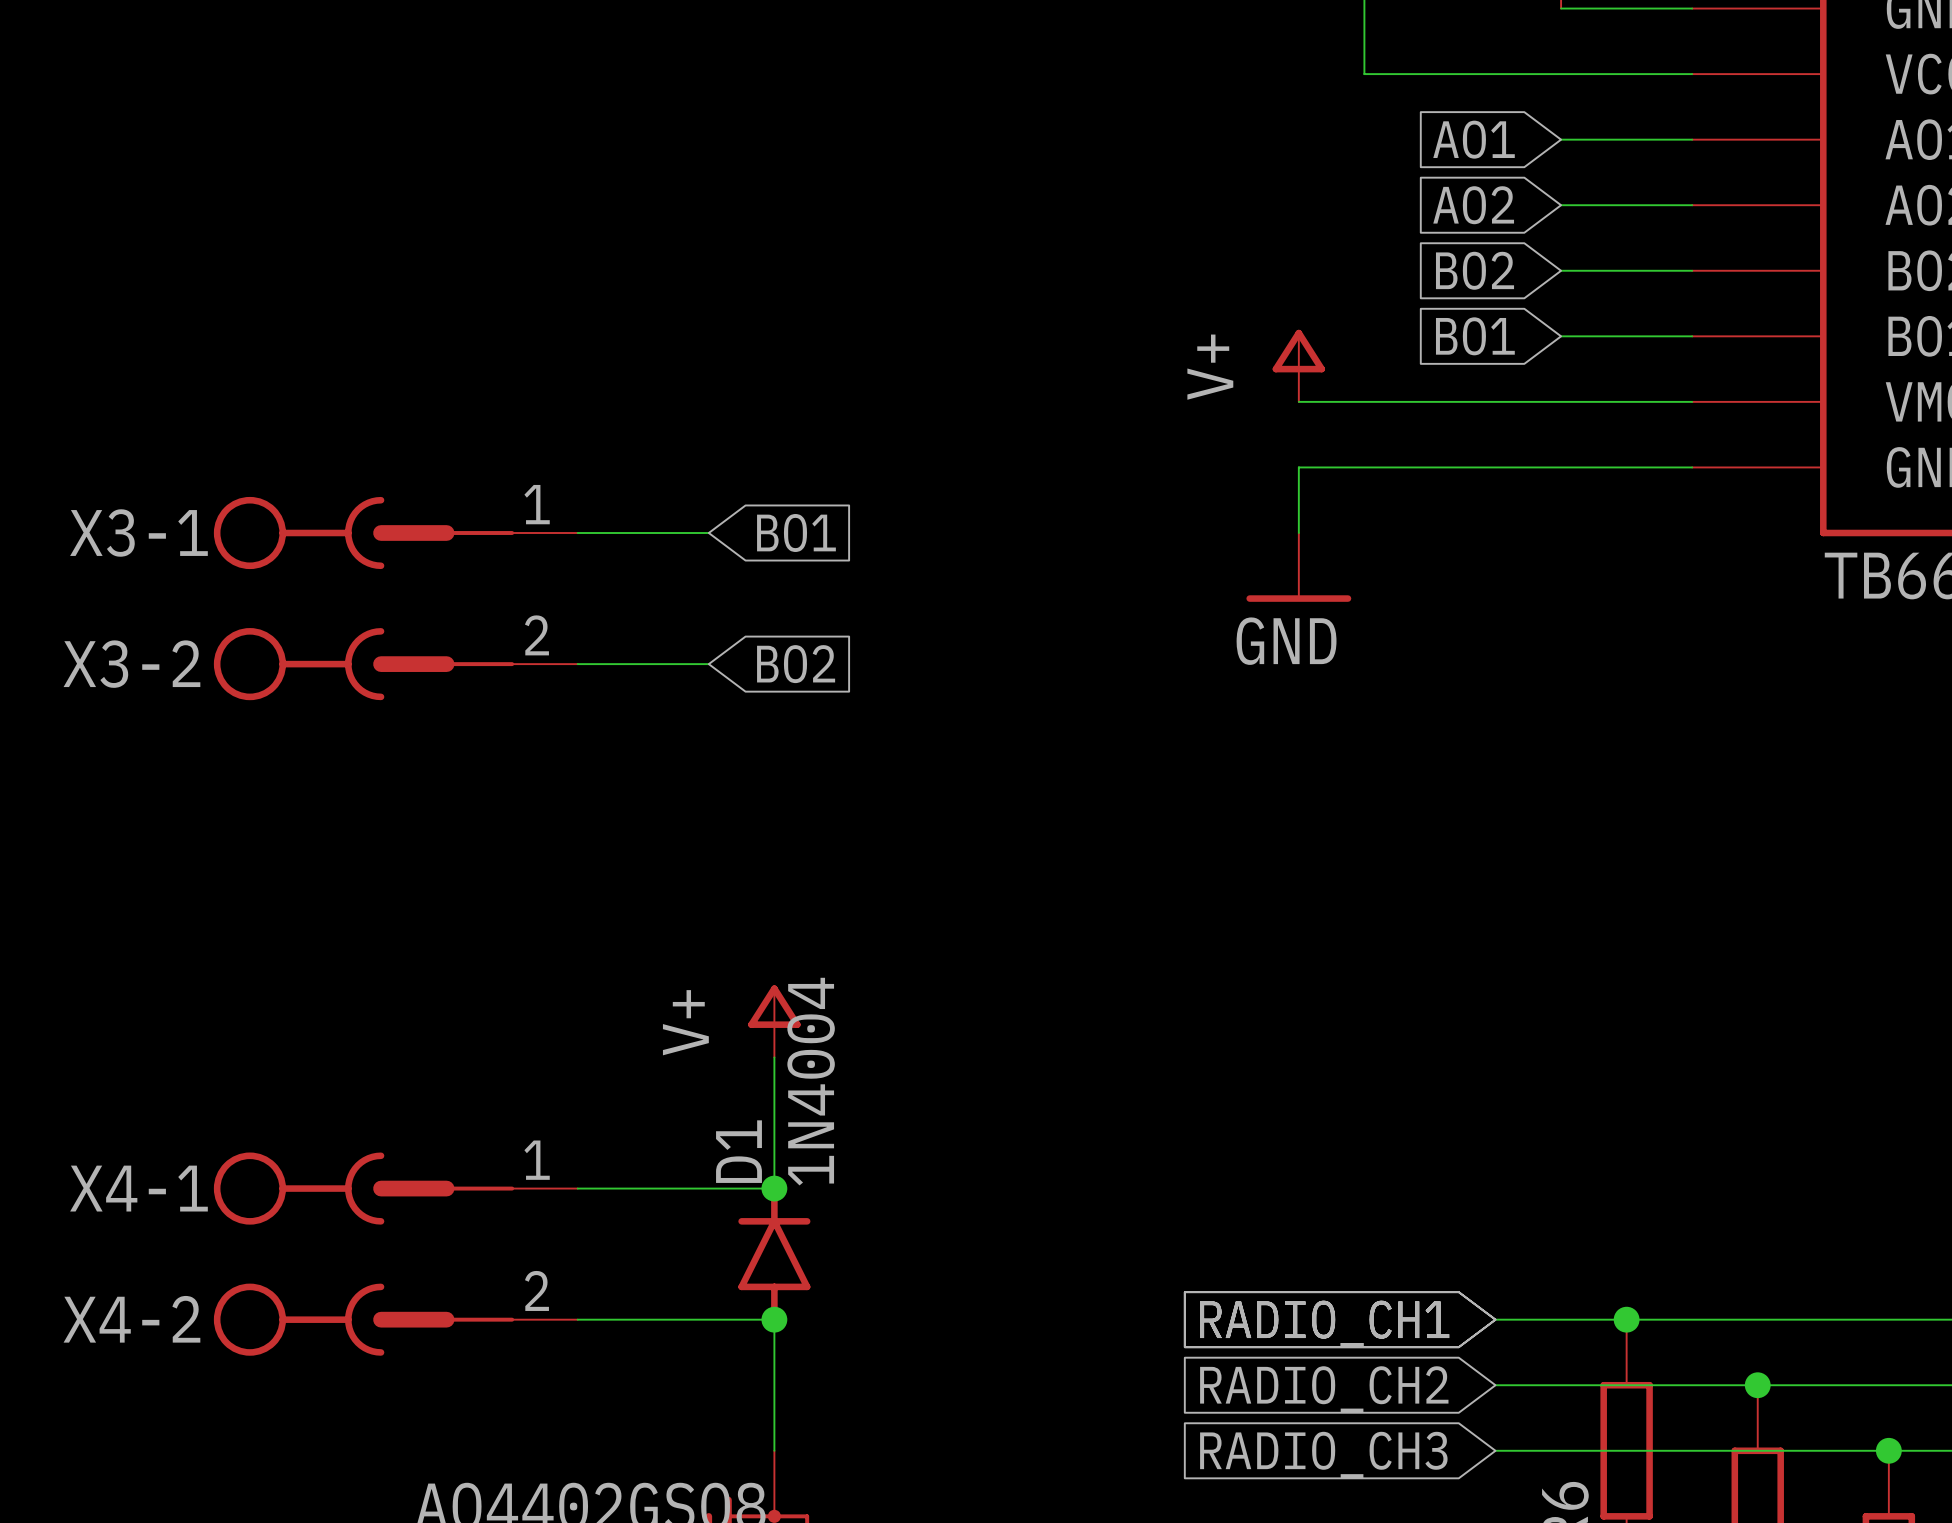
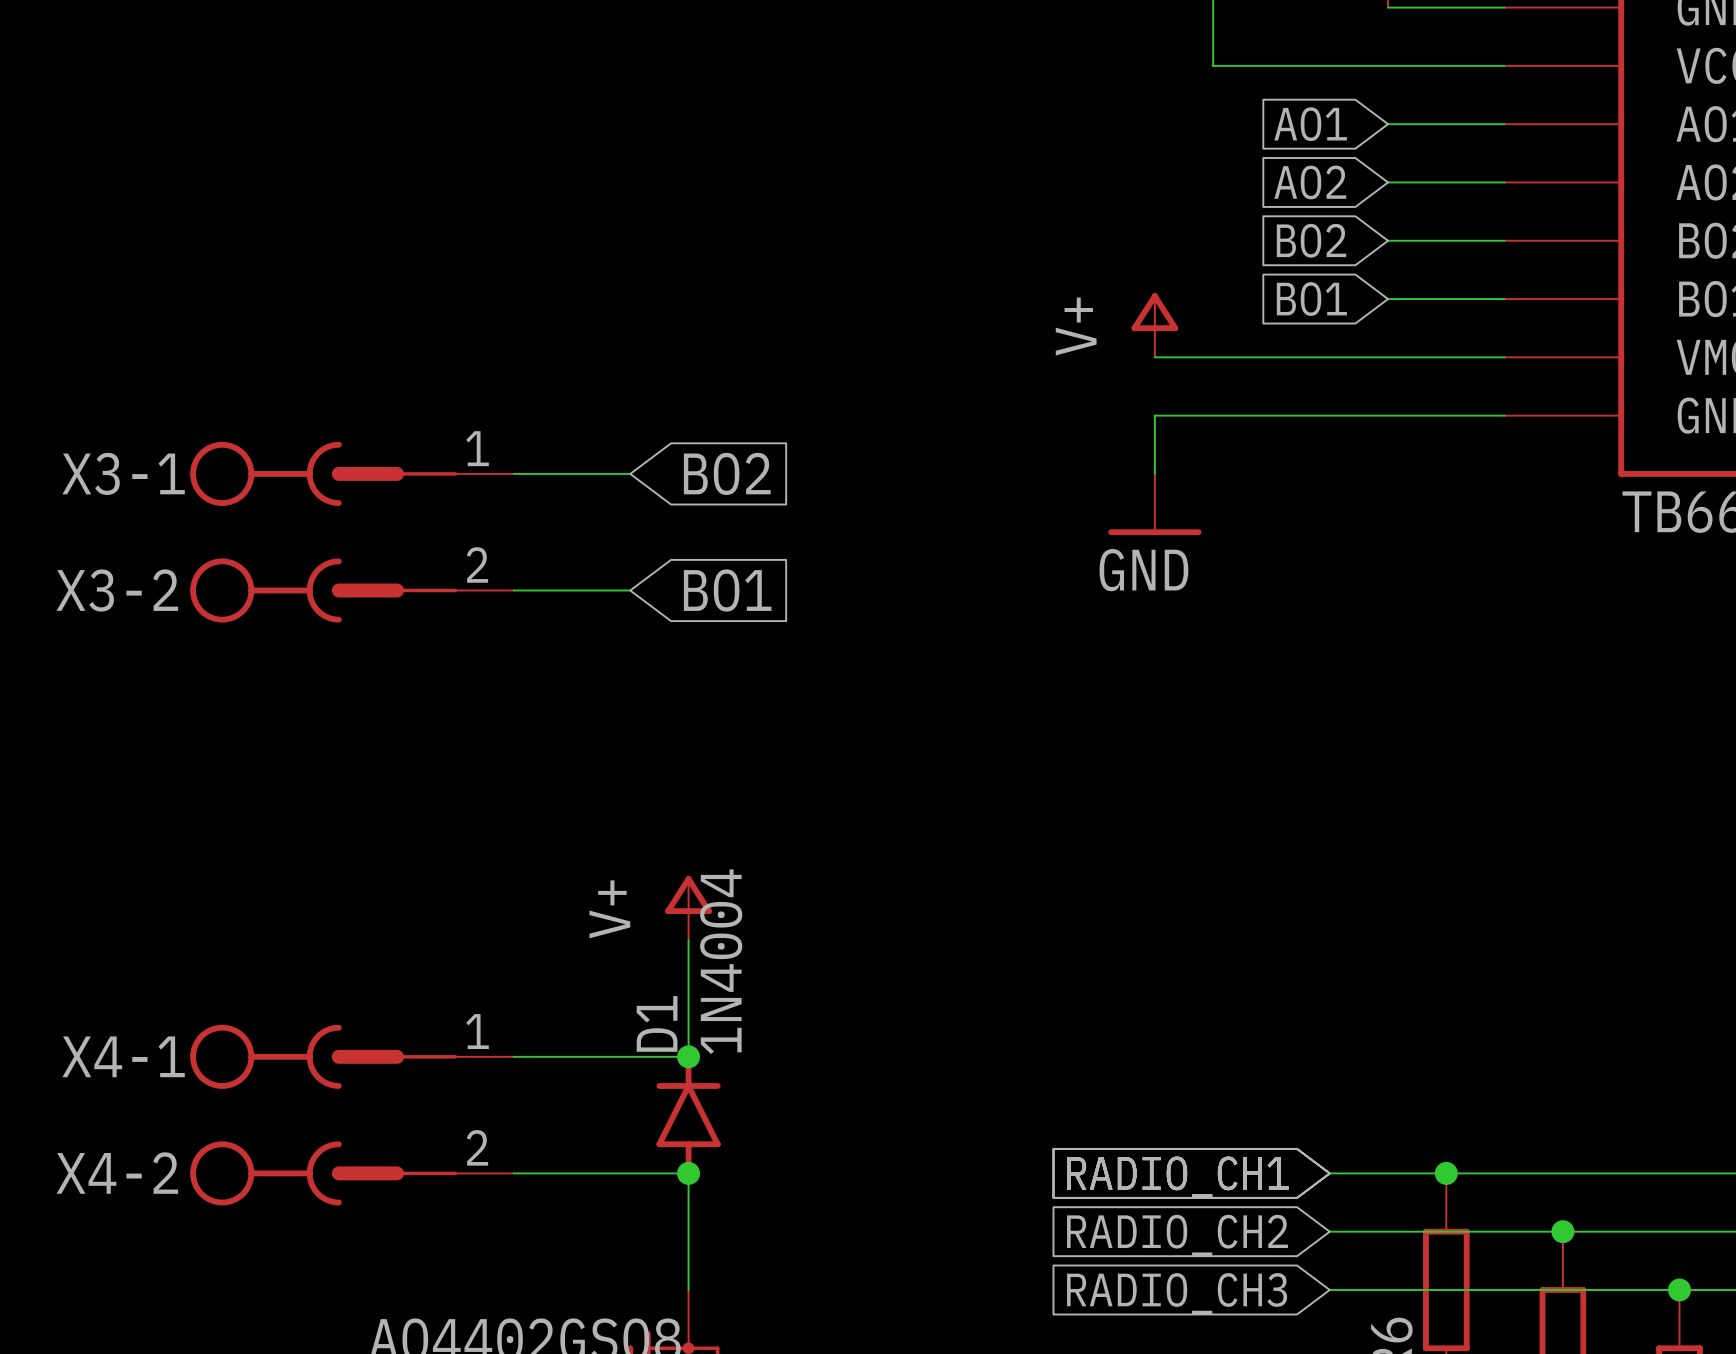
global label: BO1 (796, 533) -> BO2 (727, 473)
global label: BO2 (796, 664) -> BO1 (727, 590)

